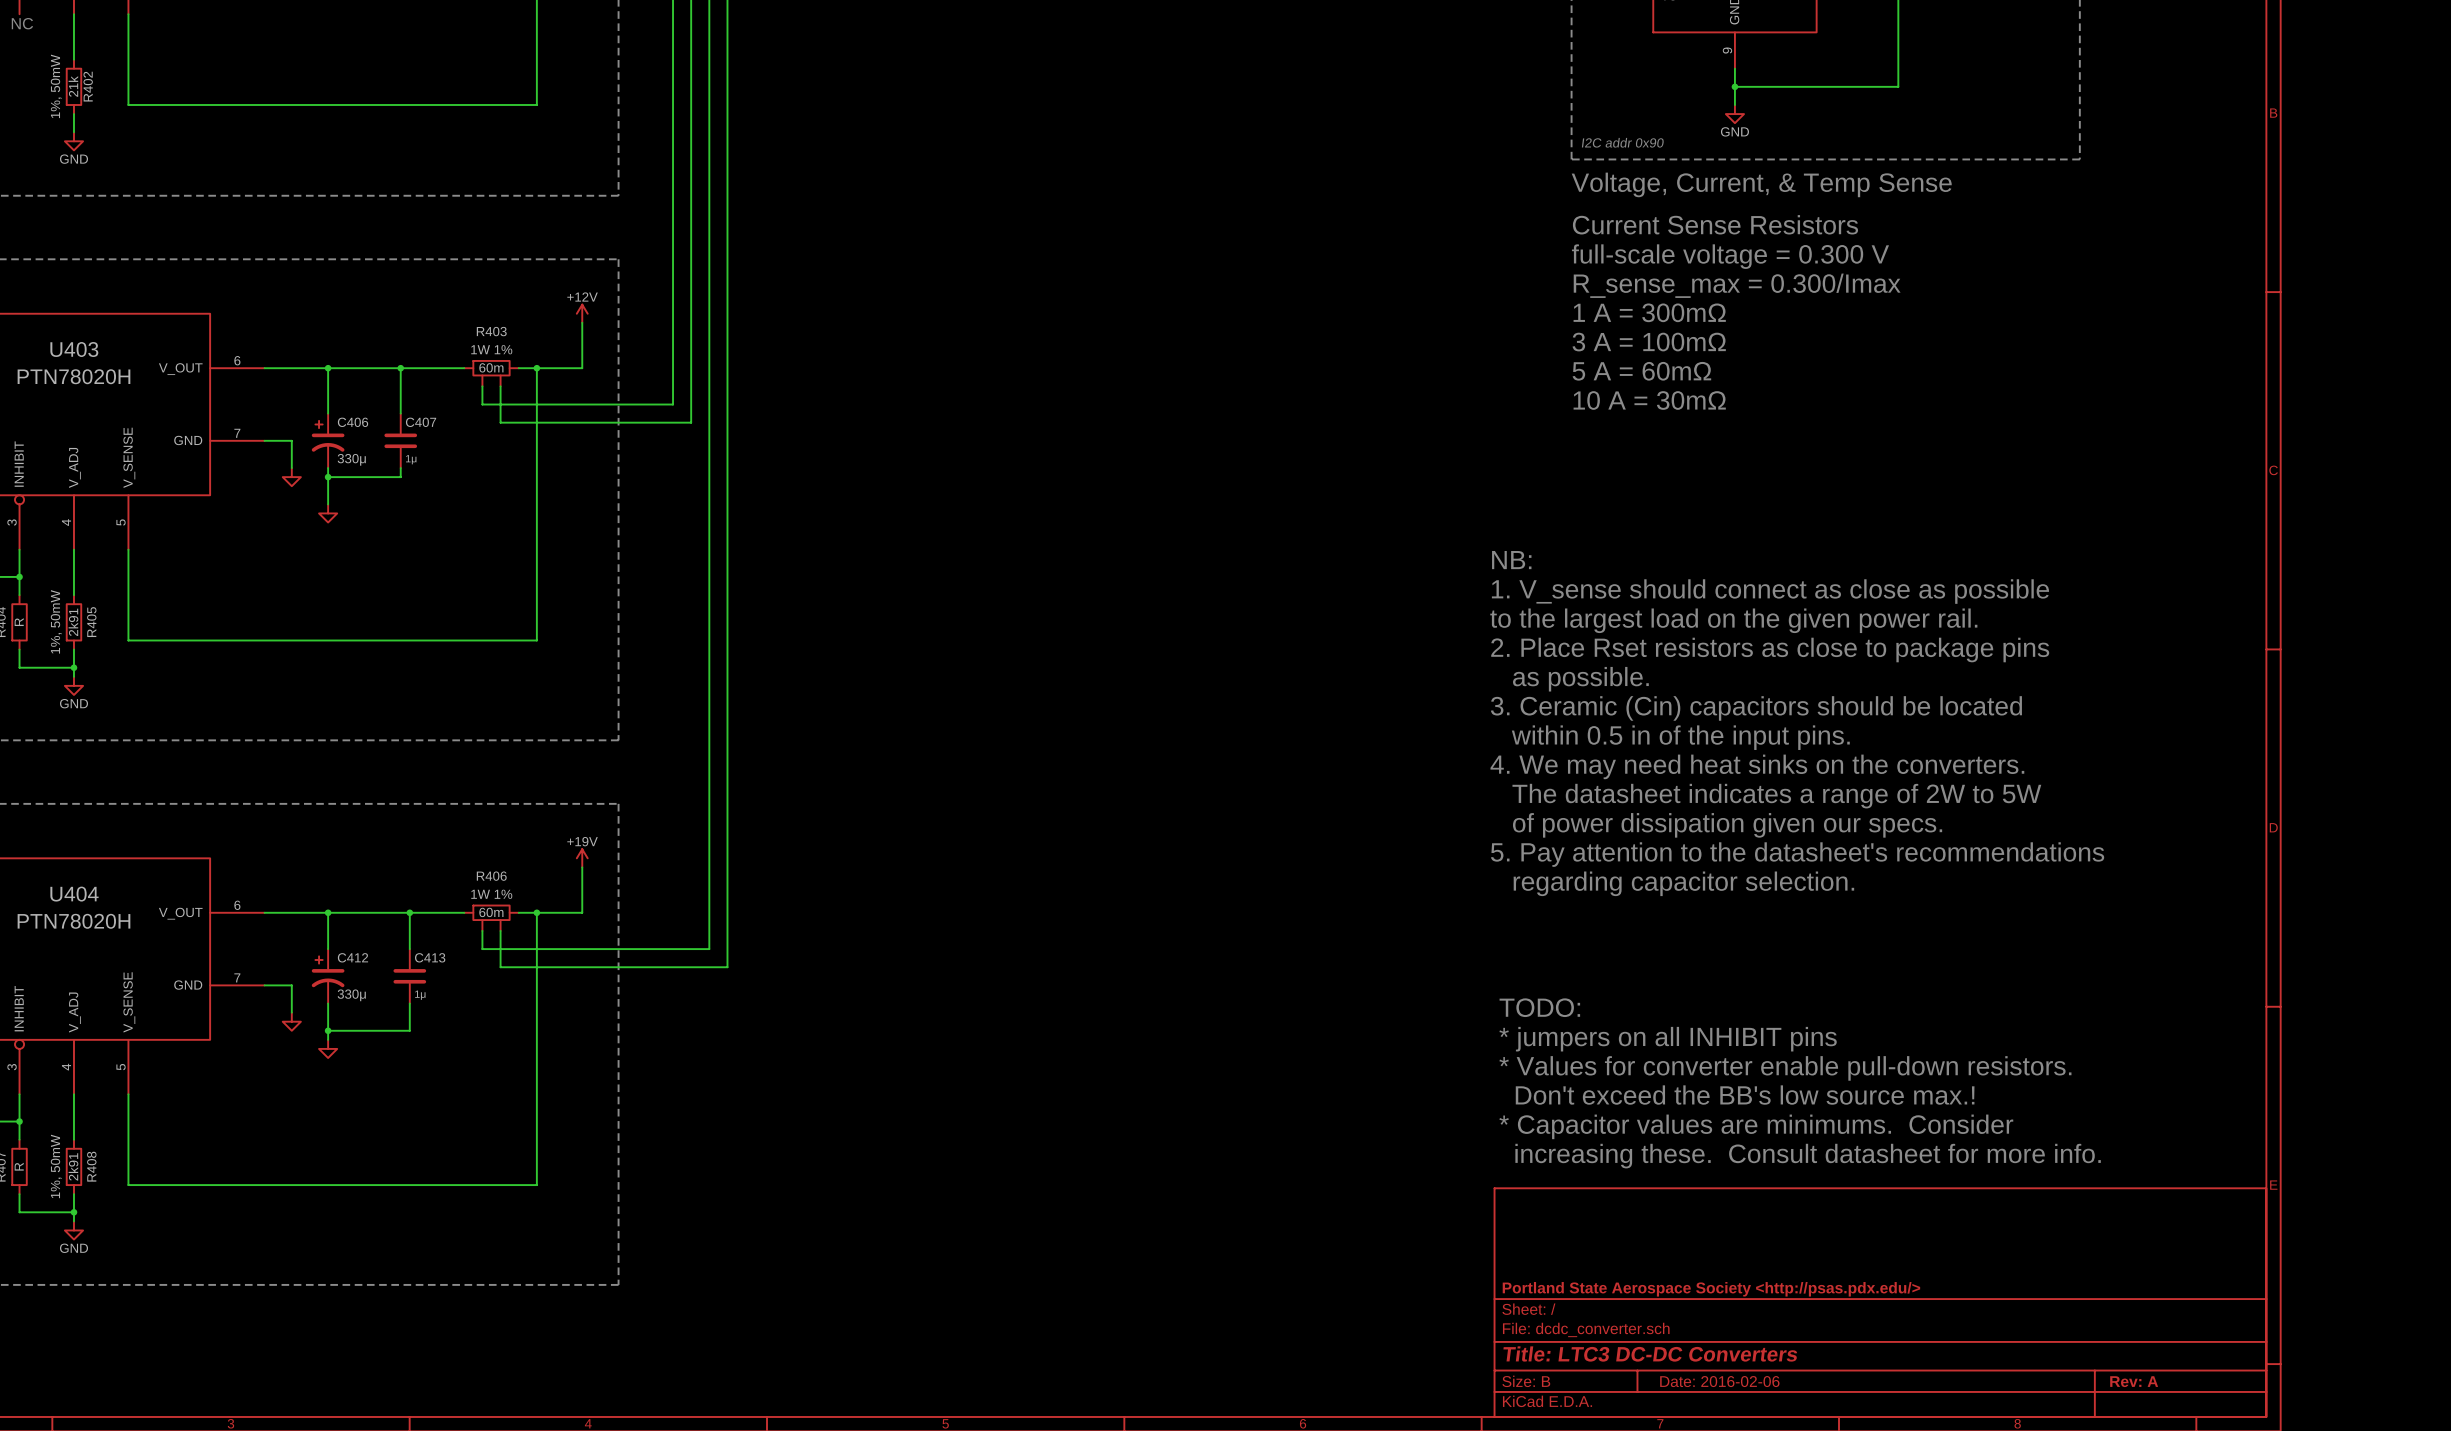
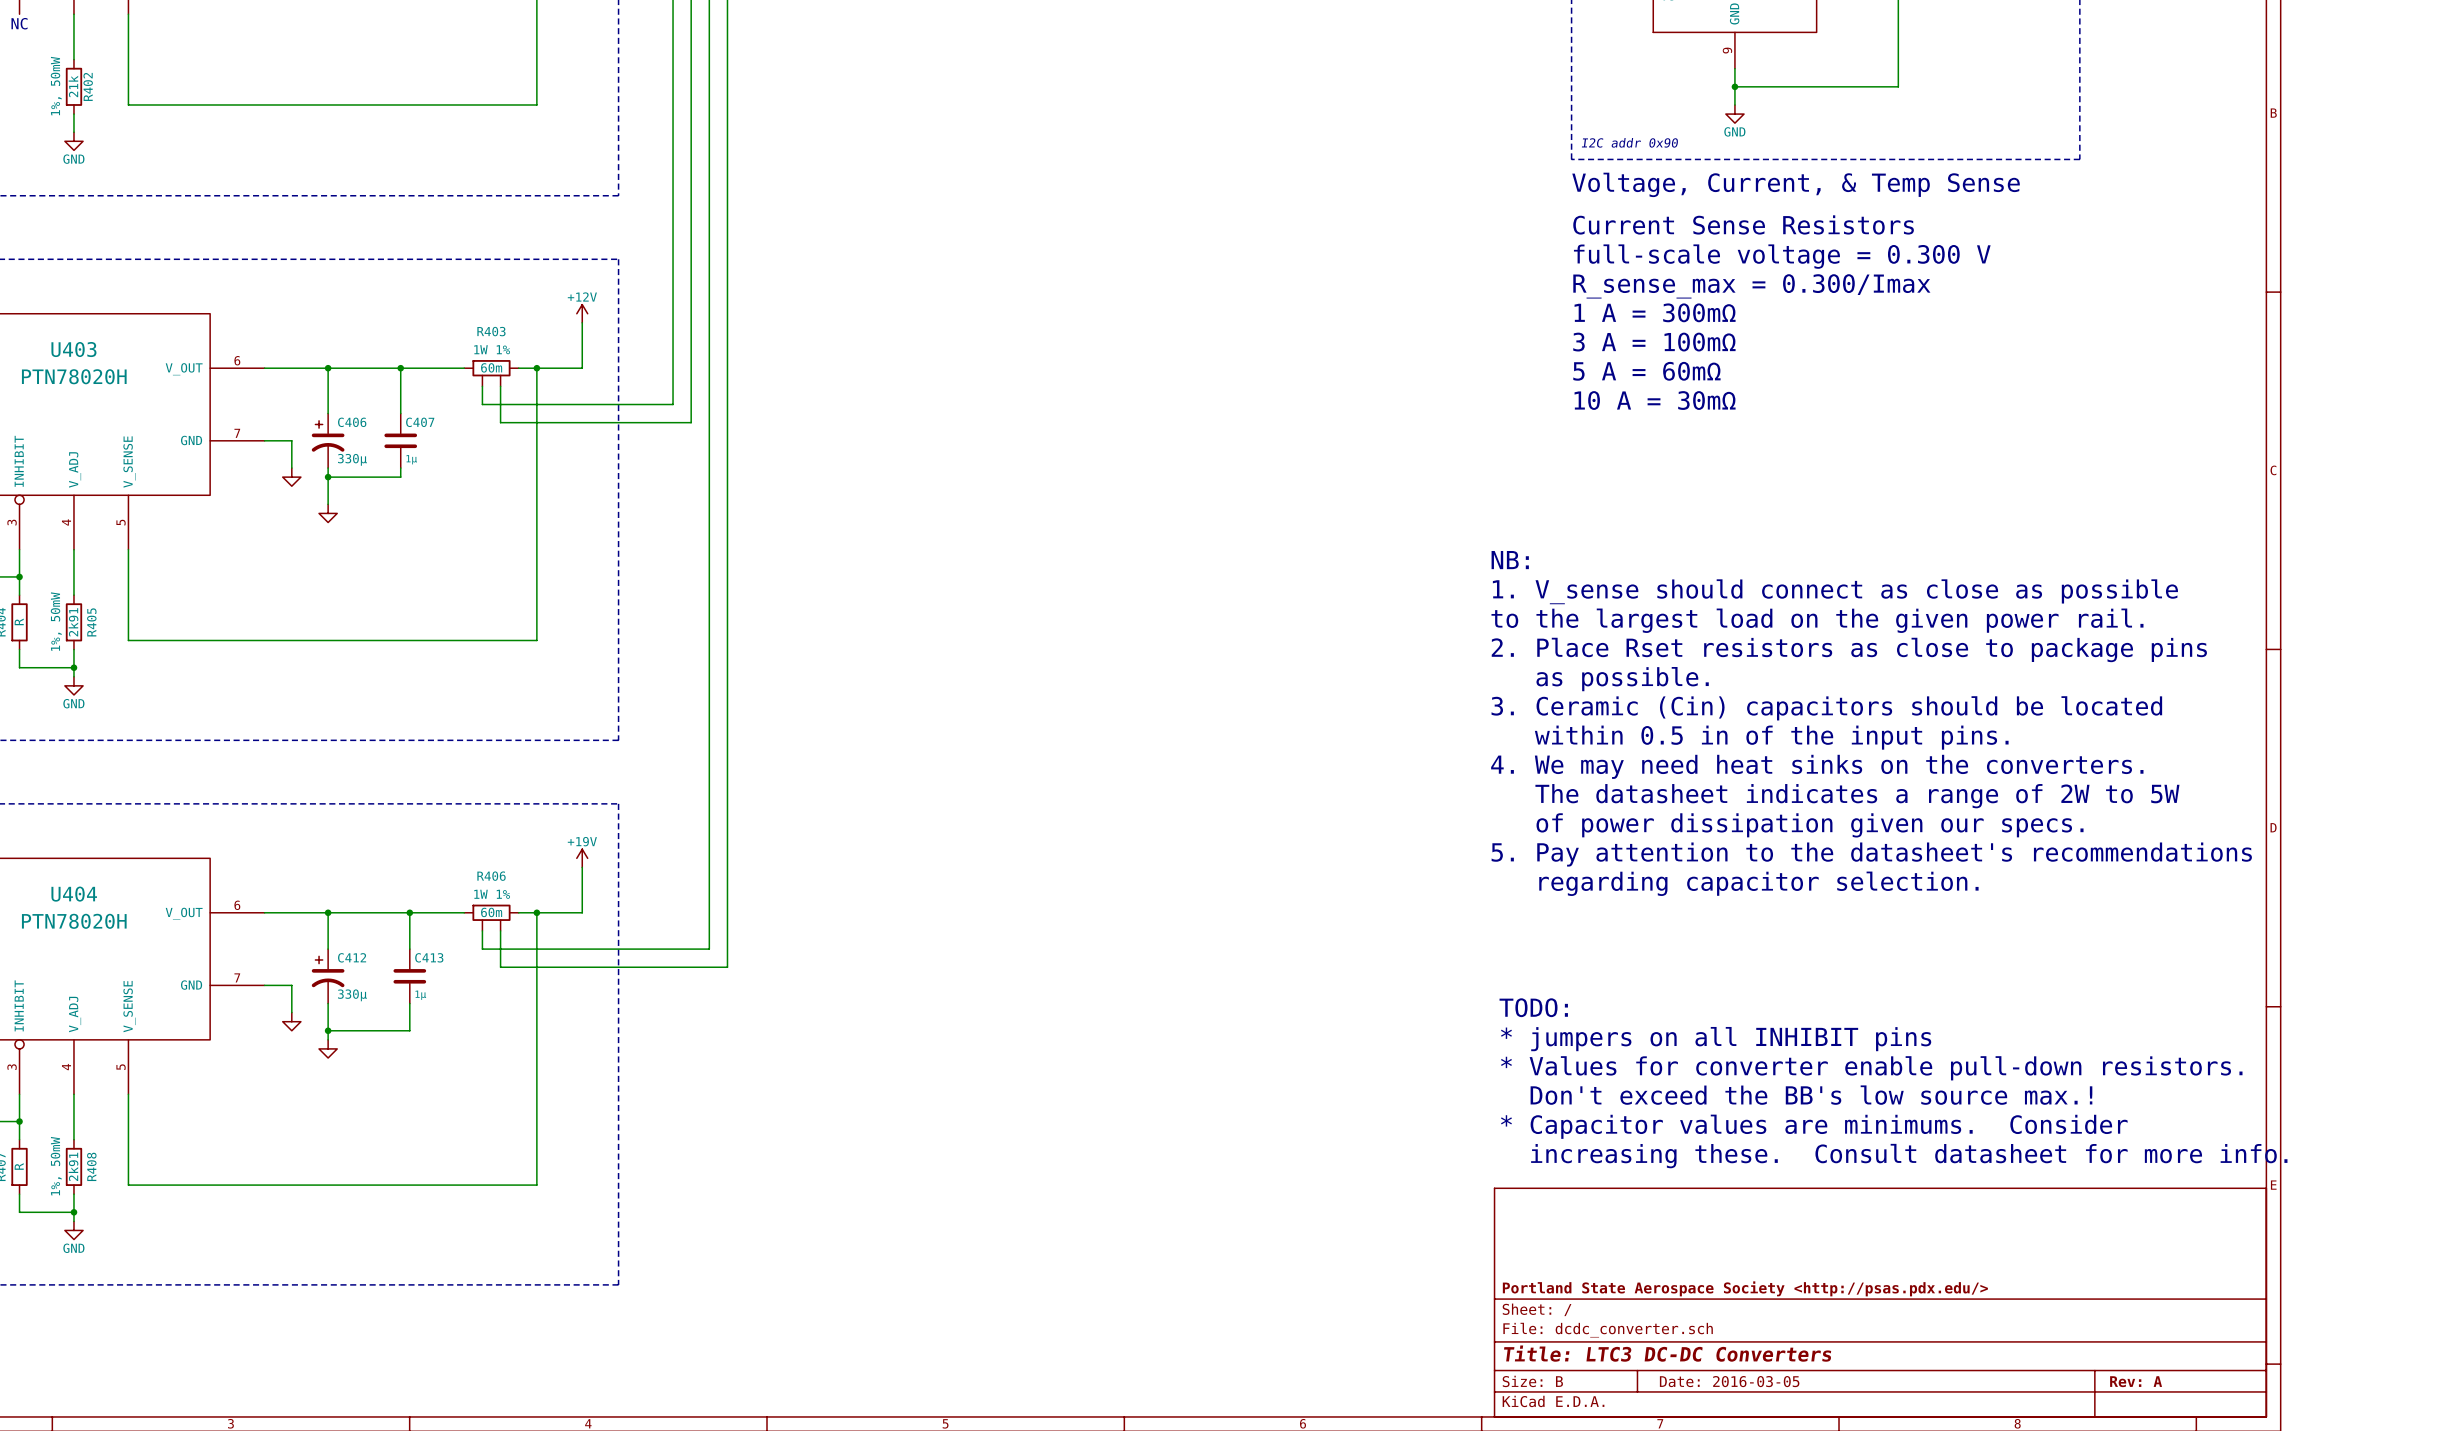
title block: Date: 2016-02-06 (1719, 1381) -> Date: 2016-03-05 (1729, 1381)

